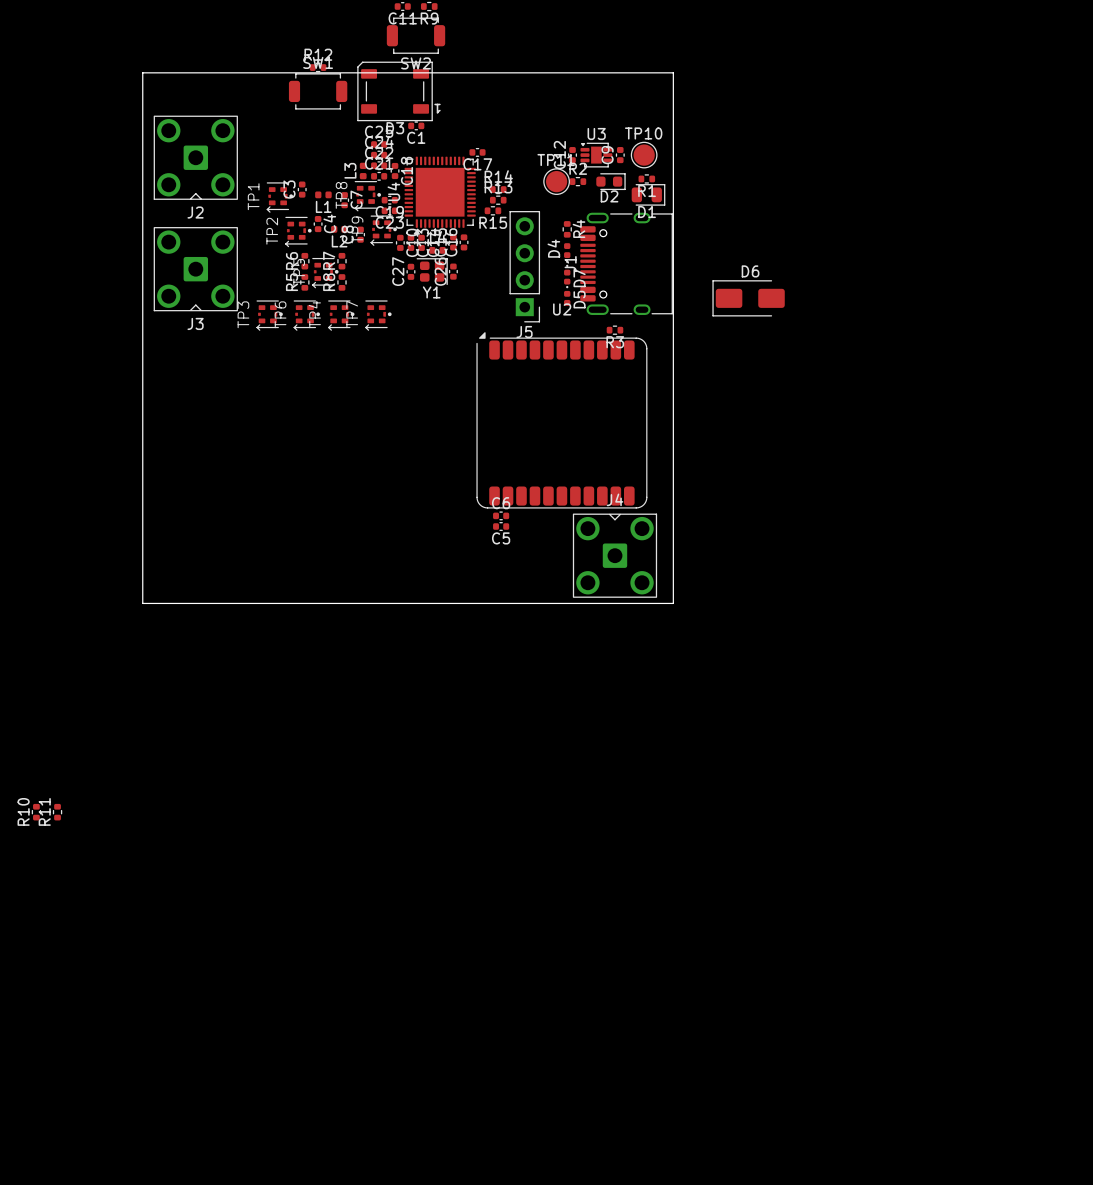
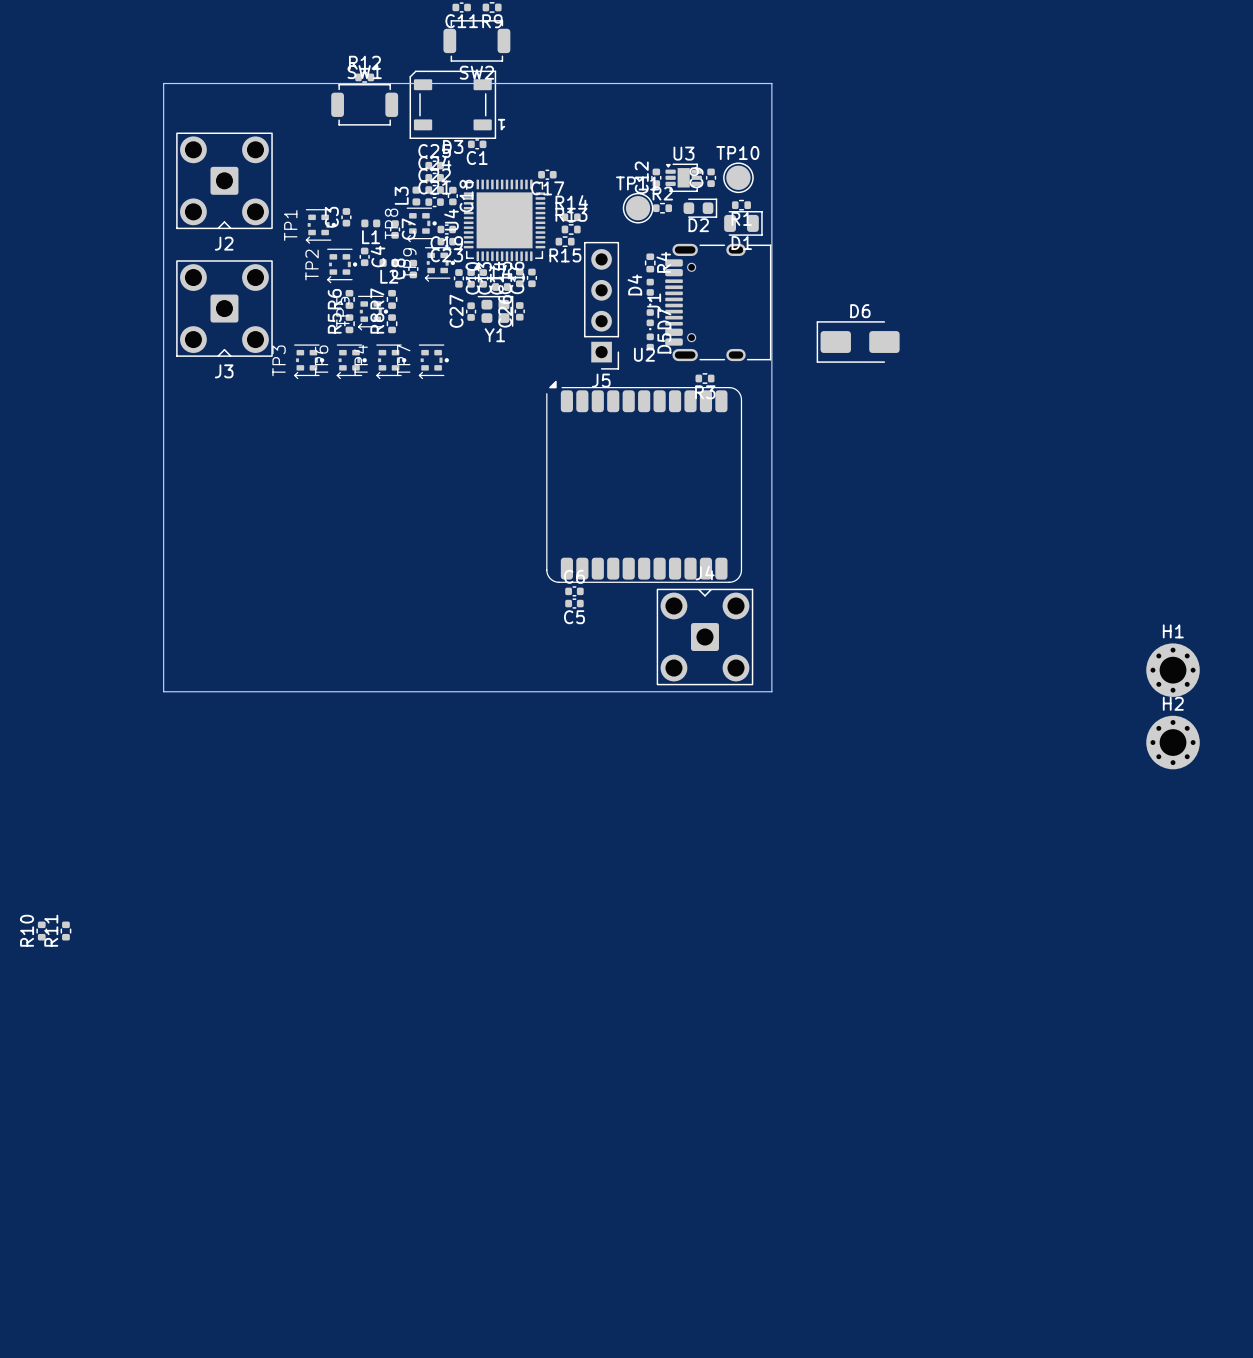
H1: none -> (1173, 670)
H2: none -> (1173, 742)

